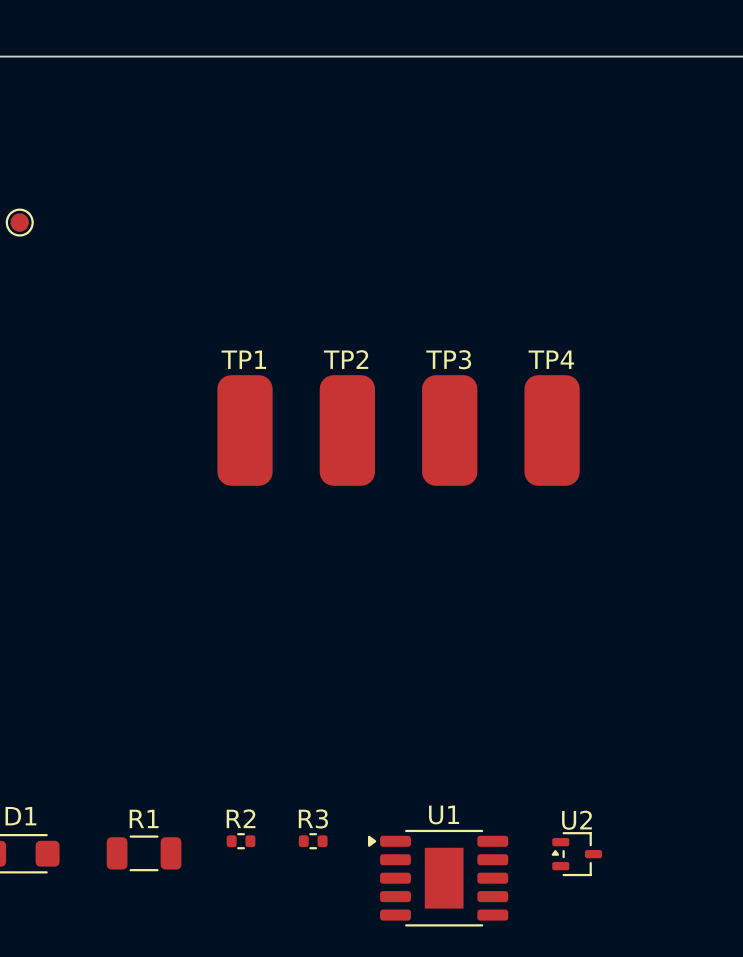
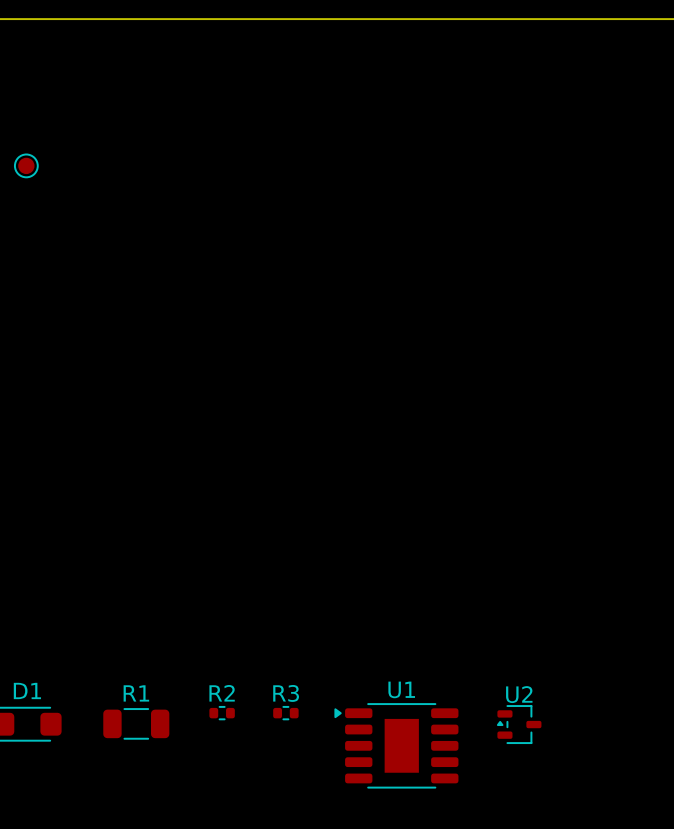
TP1: (245, 430) -> none
TP2: (347, 430) -> none
TP3: (449, 430) -> none
TP4: (552, 430) -> none

